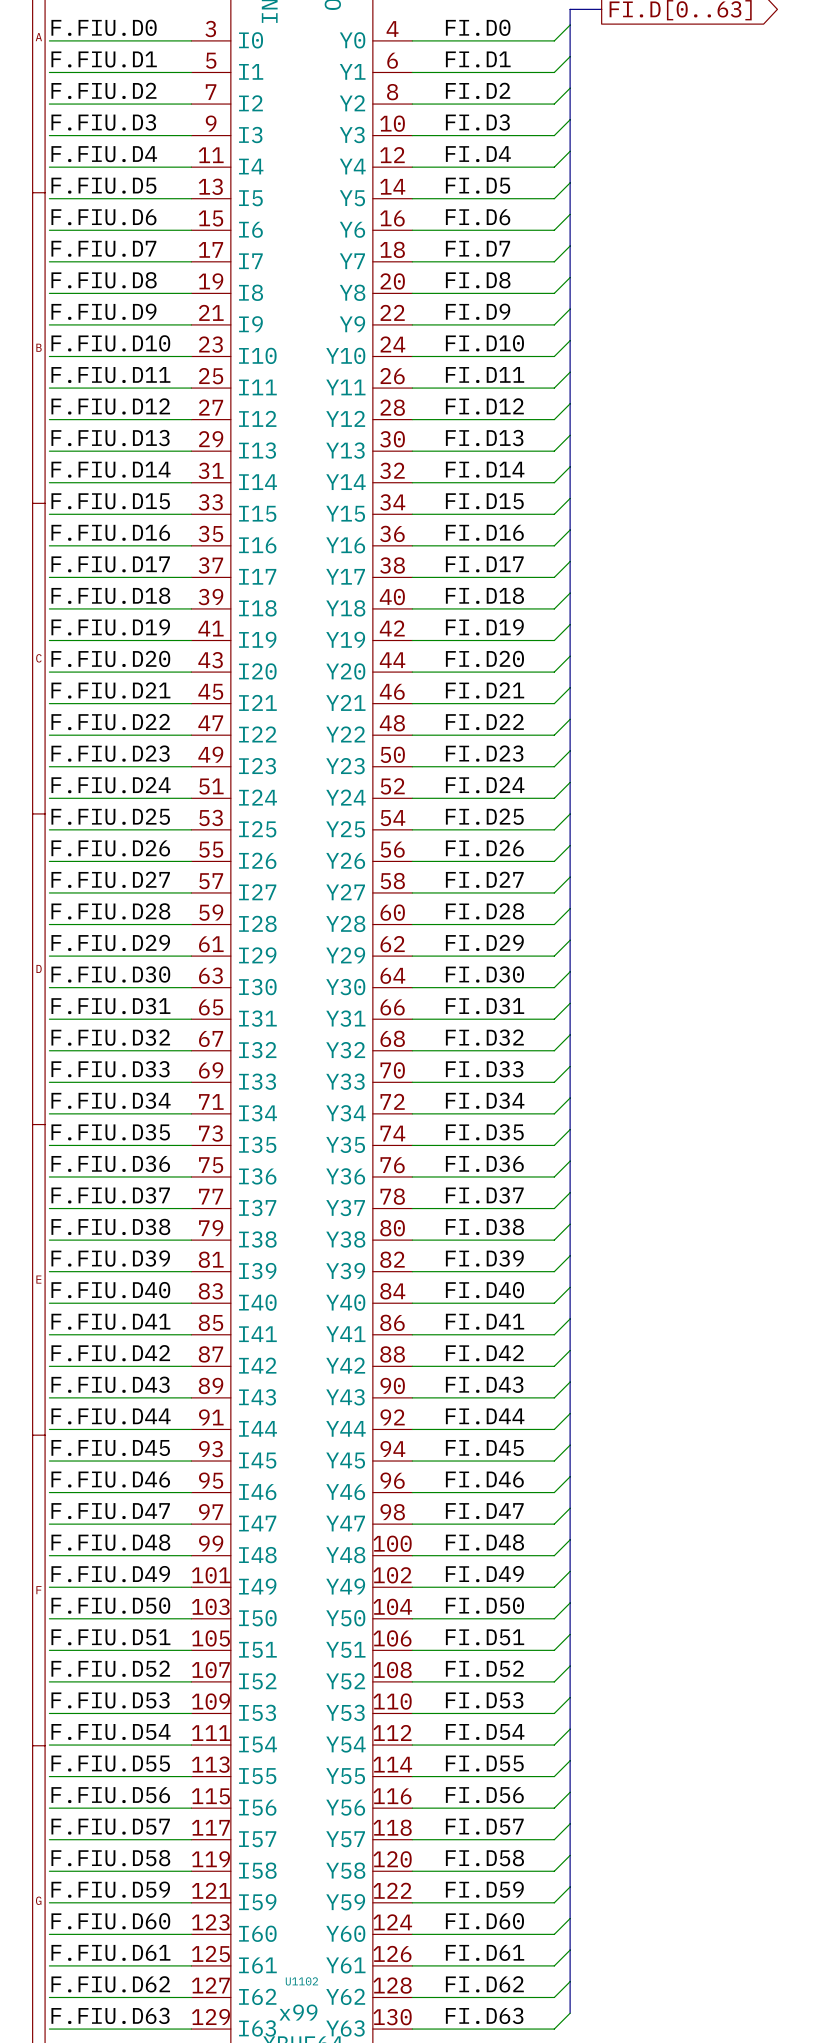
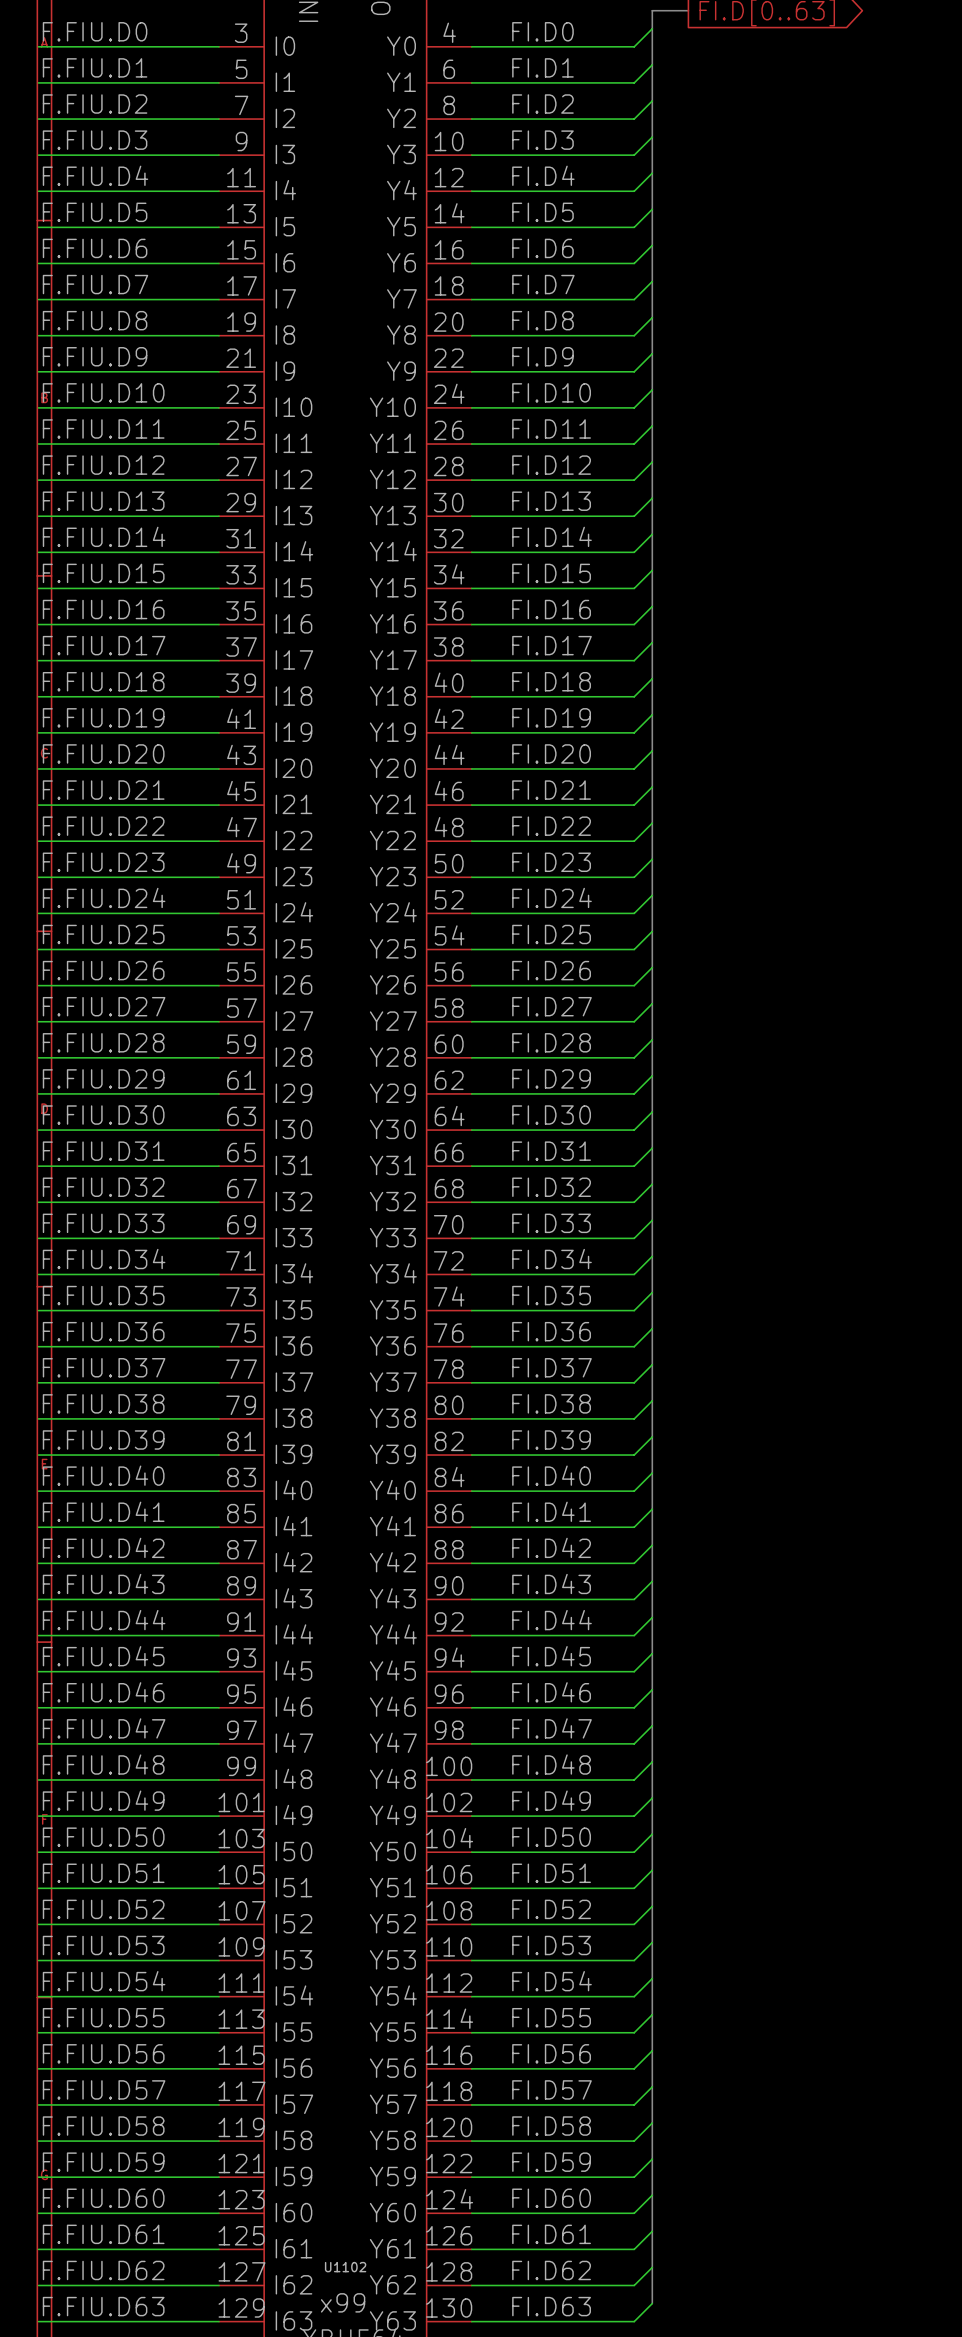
label position: F.FIU.D0 (104, 27) -> F.FIU.D0 (95, 31)
wire: none -> (38, 46) (56, 46)
label position: F.FIU.D1 (104, 59) -> F.FIU.D1 (95, 67)
wire: none -> (38, 82) (56, 82)
label position: F.FIU.D2 (103, 90) -> F.FIU.D2 (95, 104)
wire: none -> (38, 119) (56, 119)
label position: F.FIU.D3 (103, 122) -> F.FIU.D3 (95, 140)
wire: none -> (38, 155) (56, 155)
label position: F.FIU.D4 (104, 154) -> F.FIU.D4 (95, 175)
wire: none -> (38, 191) (56, 191)
label position: F.FIU.D5 (103, 185) -> F.FIU.D5 (95, 212)
wire: none -> (38, 227) (56, 227)
label position: F.FIU.D6 (103, 217) -> F.FIU.D6 (95, 248)
wire: none -> (38, 263) (56, 263)
label position: F.FIU.D7 (103, 248) -> F.FIU.D7 (95, 284)
wire: none -> (38, 299) (56, 299)
label position: F.FIU.D8 (104, 280) -> F.FIU.D8 (95, 320)
wire: none -> (38, 335) (56, 335)
label position: F.FIU.D9 (103, 311) -> F.FIU.D9 (95, 356)
wire: none -> (38, 371) (56, 371)
label position: F.FIU.D10 (110, 343) -> F.FIU.D10 (103, 392)
wire: none -> (38, 407) (56, 407)
label position: F.FIU.D11 (110, 375) -> F.FIU.D11 (103, 428)
wire: none -> (38, 444) (56, 444)
label position: F.FIU.D12 (110, 406) -> F.FIU.D12 (103, 465)
wire: none -> (38, 480) (56, 480)
label position: F.FIU.D13 (110, 438) -> F.FIU.D13 (103, 501)
wire: none -> (38, 516) (56, 516)
label position: F.FIU.D14 (111, 469) -> F.FIU.D14 (104, 536)
wire: none -> (38, 552) (56, 552)
label position: F.FIU.D15 (110, 501) -> F.FIU.D15 (103, 573)
wire: none -> (38, 588) (56, 588)
label position: F.FIU.D16 (110, 532) -> F.FIU.D16 (103, 609)
wire: none -> (38, 624) (56, 624)
label position: F.FIU.D17 (110, 564) -> F.FIU.D17 (104, 645)
wire: none -> (38, 660) (56, 660)
label position: F.FIU.D18 (110, 595) -> F.FIU.D18 (103, 681)
wire: none -> (38, 696) (56, 696)
label position: F.FIU.D19 (110, 627) -> F.FIU.D19 (103, 717)
wire: none -> (38, 732) (56, 732)
label position: F.FIU.D20 (110, 658) -> F.FIU.D20 (103, 753)
wire: none -> (38, 768) (56, 768)
label position: F.FIU.D21 (110, 690) -> F.FIU.D21 (103, 790)
wire: none -> (38, 805) (56, 805)
label position: F.FIU.D22 (110, 722) -> F.FIU.D22 (103, 826)
wire: none -> (38, 841) (56, 841)
label position: F.FIU.D23 (110, 753) -> F.FIU.D23 (103, 862)
wire: none -> (38, 877) (56, 877)
label position: F.FIU.D24 (111, 785) -> F.FIU.D24 (104, 897)
wire: none -> (38, 913) (56, 913)
label position: F.FIU.D25 (110, 816) -> F.FIU.D25 (103, 934)
wire: none -> (38, 949) (56, 949)
label position: F.FIU.D26 (110, 848) -> F.FIU.D26 (103, 970)
wire: none -> (38, 985) (56, 985)
label position: F.FIU.D27 (110, 879) -> F.FIU.D27 (104, 1006)
wire: none -> (38, 1021) (56, 1021)
label position: F.FIU.D28 (110, 911) -> F.FIU.D28 (103, 1042)
wire: none -> (38, 1057) (56, 1057)
label position: F.FIU.D29 (110, 942) -> F.FIU.D29 (103, 1078)
wire: none -> (38, 1093) (56, 1093)
label position: F.FIU.D30 (110, 974) -> F.FIU.D30 (103, 1115)
wire: none -> (38, 1130) (56, 1130)
label position: F.FIU.D31 (110, 1006) -> F.FIU.D31 (103, 1151)
wire: none -> (38, 1166) (56, 1166)
label position: F.FIU.D32 (110, 1037) -> F.FIU.D32 (103, 1187)
wire: none -> (38, 1202) (56, 1202)
label position: F.FIU.D33 (110, 1069) -> F.FIU.D33 (103, 1223)
wire: none -> (38, 1238) (56, 1238)
label position: F.FIU.D34 (111, 1100) -> F.FIU.D34 (104, 1259)
wire: none -> (38, 1274) (56, 1274)
label position: F.FIU.D35 (110, 1132) -> F.FIU.D35 (103, 1295)
wire: none -> (38, 1310) (56, 1310)
label position: F.FIU.D36 (110, 1163) -> F.FIU.D36 (103, 1331)
wire: none -> (38, 1346) (56, 1346)
label position: F.FIU.D37 (110, 1195) -> F.FIU.D37 (104, 1367)
wire: none -> (38, 1382) (56, 1382)
label position: F.FIU.D38 (110, 1226) -> F.FIU.D38 (103, 1403)
wire: none -> (38, 1418) (56, 1418)
label position: F.FIU.D39 (110, 1258) -> F.FIU.D39 (103, 1439)
wire: none -> (38, 1455) (56, 1455)
label position: F.FIU.D40 (110, 1290) -> F.FIU.D40 (103, 1475)
wire: none -> (38, 1491) (56, 1491)
label position: F.FIU.D41 (110, 1321) -> F.FIU.D41 (103, 1511)
wire: none -> (38, 1527) (56, 1527)
label position: F.FIU.D42 (110, 1353) -> F.FIU.D42 (103, 1547)
wire: none -> (38, 1563) (56, 1563)
label position: F.FIU.D43 (110, 1384) -> F.FIU.D43 (103, 1583)
wire: none -> (38, 1599) (56, 1599)
label position: F.FIU.D44 (111, 1416) -> F.FIU.D44 (104, 1620)
wire: none -> (38, 1635) (56, 1635)
label position: F.FIU.D45 (110, 1448) -> F.FIU.D45 (103, 1656)
wire: none -> (38, 1671) (56, 1671)
label position: F.FIU.D46 (110, 1479) -> F.FIU.D46 (103, 1692)
wire: none -> (38, 1707) (56, 1707)
label position: F.FIU.D47 (110, 1511) -> F.FIU.D47 (104, 1728)
wire: none -> (38, 1743) (56, 1743)
label position: F.FIU.D48 (110, 1542) -> F.FIU.D48 (103, 1764)
wire: none -> (38, 1779) (56, 1779)
label position: F.FIU.D49 (110, 1574) -> F.FIU.D49 (103, 1800)
wire: none -> (38, 1816) (56, 1816)
label position: F.FIU.D50 (110, 1605) -> F.FIU.D50 (103, 1837)
wire: none -> (38, 1852) (56, 1852)
label position: F.FIU.D51 (110, 1637) -> F.FIU.D51 (103, 1873)
wire: none -> (38, 1888) (56, 1888)
label position: F.FIU.D52 (110, 1668) -> F.FIU.D52 (103, 1909)
wire: none -> (38, 1924) (56, 1924)
label position: F.FIU.D53 (110, 1700) -> F.FIU.D53 (103, 1945)
wire: none -> (38, 1960) (56, 1960)
label position: F.FIU.D54 (111, 1732) -> F.FIU.D54 (104, 1981)
wire: none -> (38, 1996) (56, 1996)
label position: F.FIU.D55 (110, 1763) -> F.FIU.D55 (103, 2017)
wire: none -> (38, 2032) (56, 2032)
label position: F.FIU.D56 (110, 1795) -> F.FIU.D56 (103, 2053)
wire: none -> (38, 2068) (56, 2068)
label position: F.FIU.D57 (110, 1826) -> F.FIU.D57 (104, 2089)
wire: none -> (38, 2104) (56, 2104)
label position: F.FIU.D58 (110, 1858) -> F.FIU.D58 (103, 2126)
wire: none -> (38, 2141) (56, 2141)
label position: F.FIU.D59 (110, 1889) -> F.FIU.D59 (103, 2162)
wire: none -> (38, 2177) (56, 2177)
label position: F.FIU.D60 (110, 1921) -> F.FIU.D60 (103, 2198)
wire: none -> (38, 2213) (56, 2213)
label position: F.FIU.D61 (110, 1952) -> F.FIU.D61 (103, 2234)
wire: none -> (38, 2249) (56, 2249)
label position: F.FIU.D62 (110, 1984) -> F.FIU.D62 (103, 2270)
wire: none -> (38, 2285) (56, 2285)
label position: F.FIU.D63 (110, 2015) -> F.FIU.D63 (103, 2306)
wire: none -> (38, 2321) (56, 2321)

